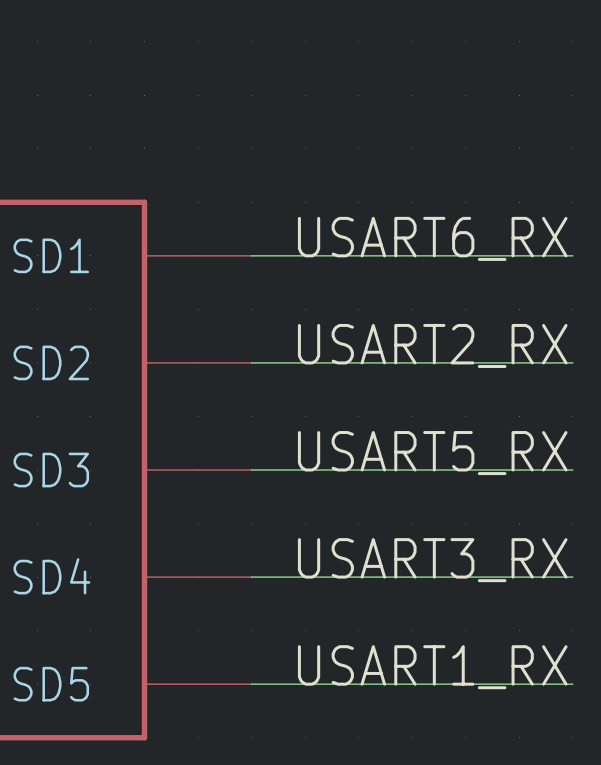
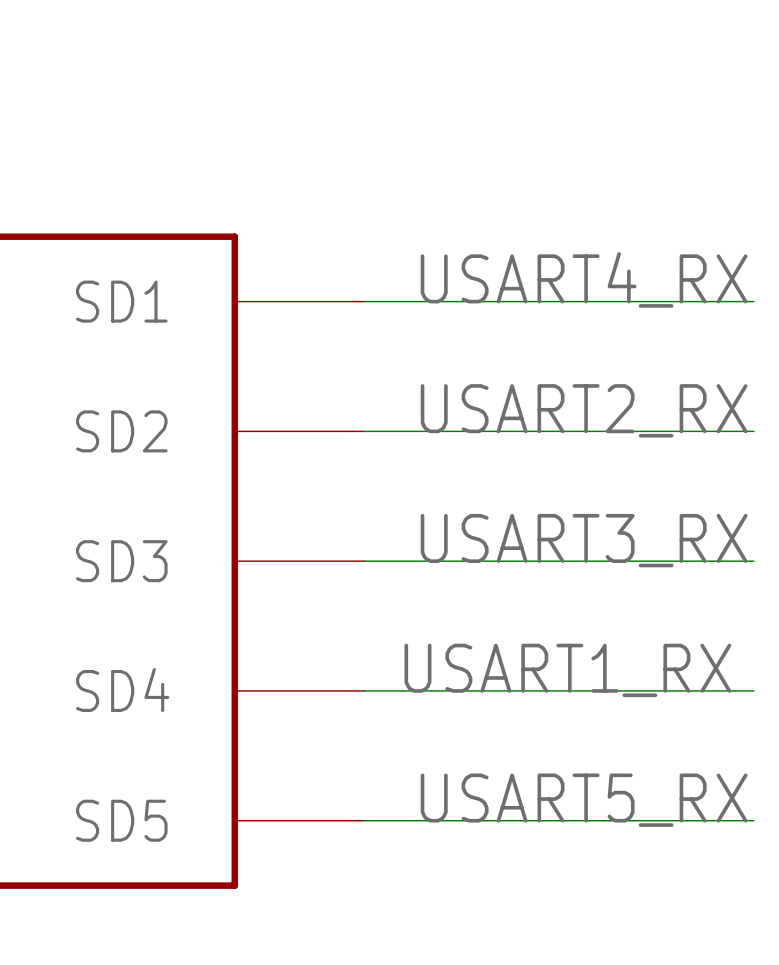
label: USART6_RX (432, 238) -> USART4_RX (584, 279)
label: USART5_RX (432, 453) -> USART3_RX (584, 540)
label: USART3_RX (432, 560) -> USART1_RX (567, 670)
label: USART1_RX (432, 667) -> USART5_RX (584, 800)

